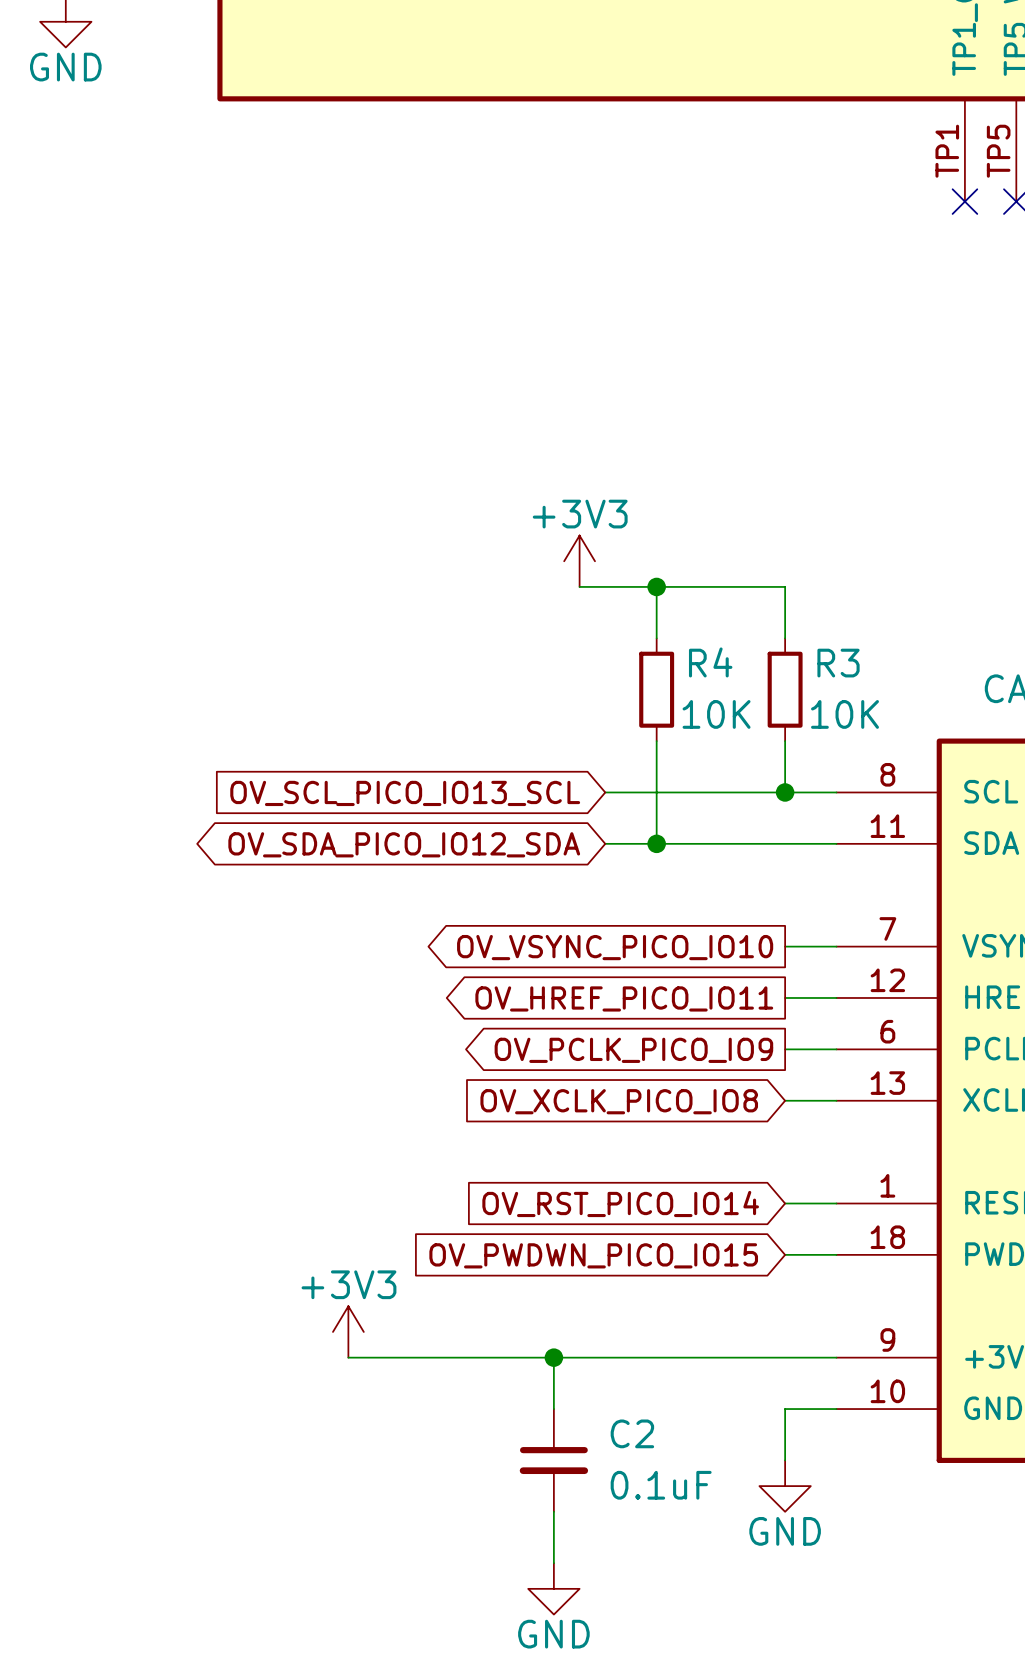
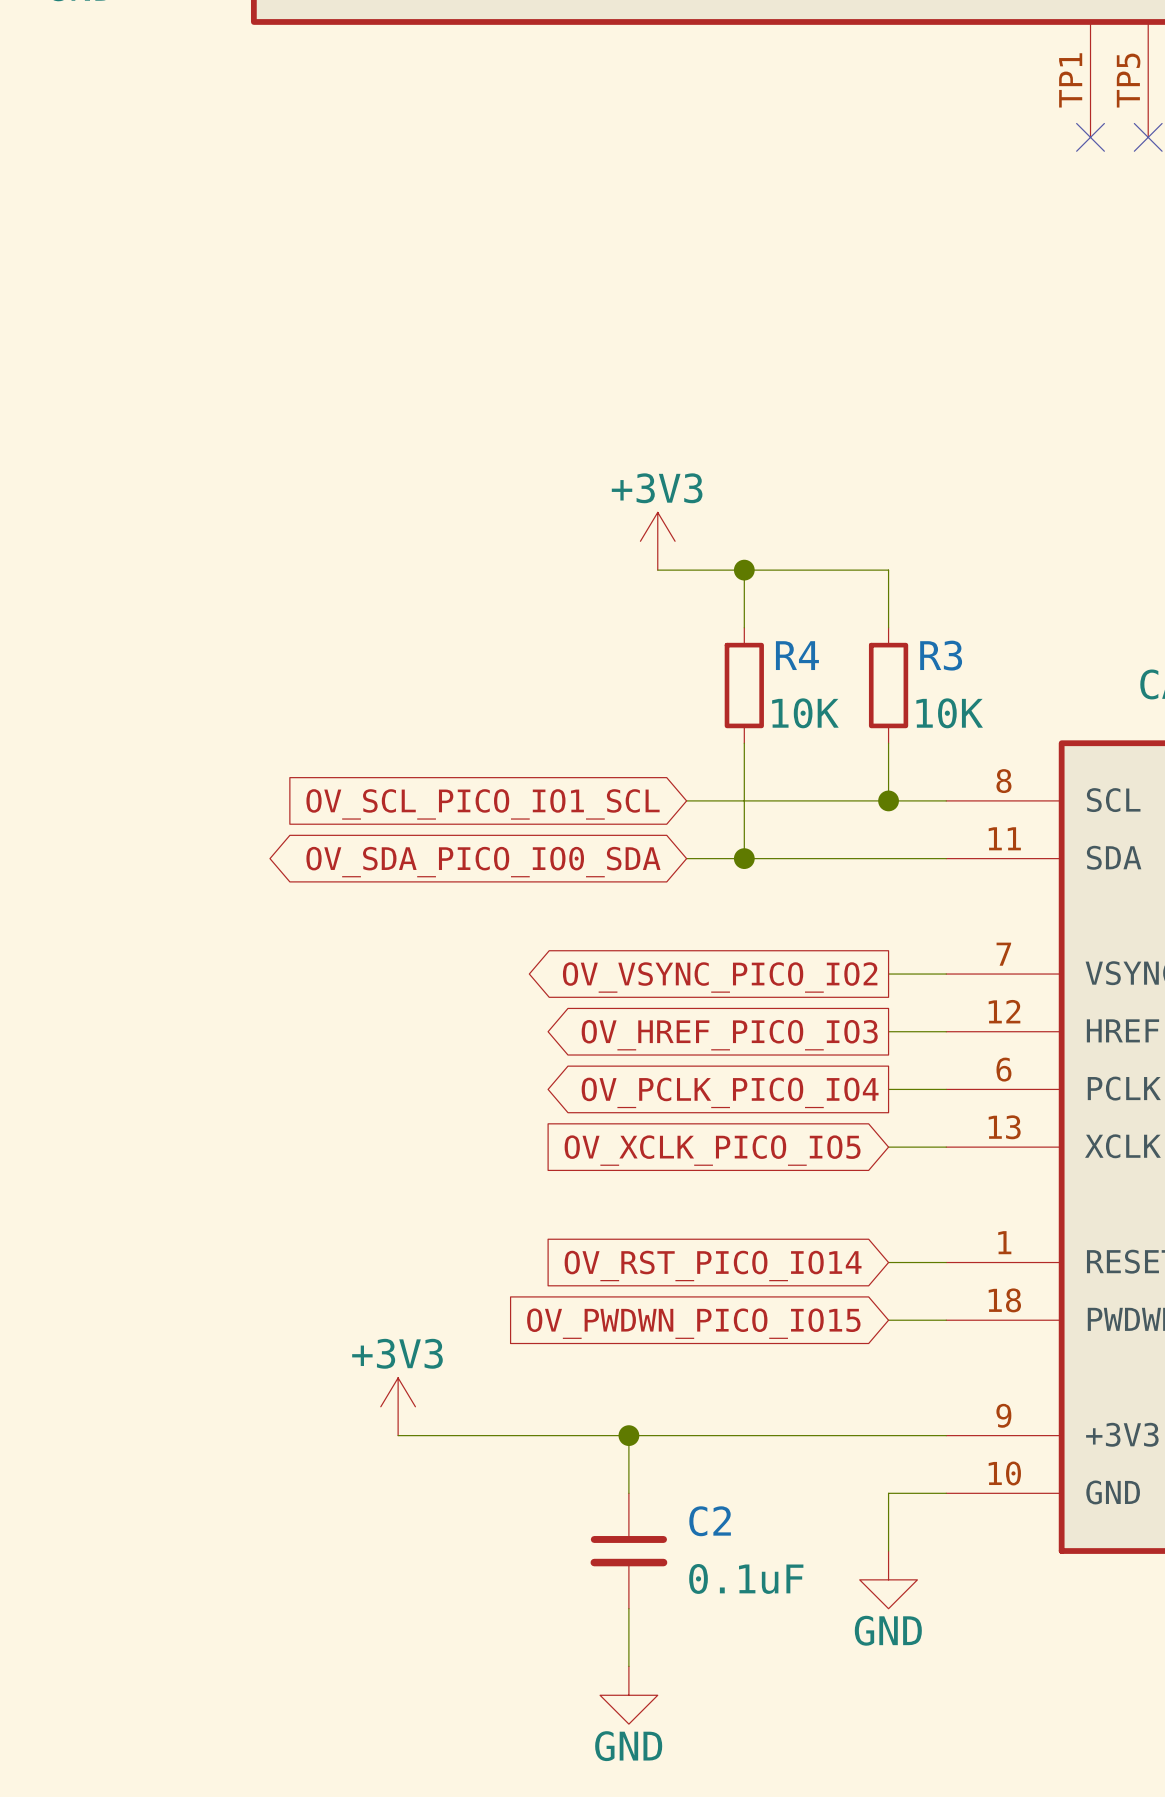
global label: OV_SCL_PICO_IO13_SCL (405, 793) -> OV_SCL_PICO_IO1_SCL (483, 804)
global label: OV_SDA_PICO_IO12_SDA (404, 844) -> OV_SDA_PICO_IO0_SDA (483, 862)
global label: OV_VSYNC_PICO_IO10 (615, 947) -> OV_VSYNC_PICO_IO2 (720, 977)
global label: OV_HREF_PICO_IO11 (624, 998) -> OV_HREF_PICO_IO3 (729, 1035)
global label: OV_PCLK_PICO_IO9 (633, 1050) -> OV_PCLK_PICO_IO4 (730, 1092)
global label: OV_XCLK_PICO_IO8 (619, 1101) -> OV_XCLK_PICO_IO5 (712, 1150)

